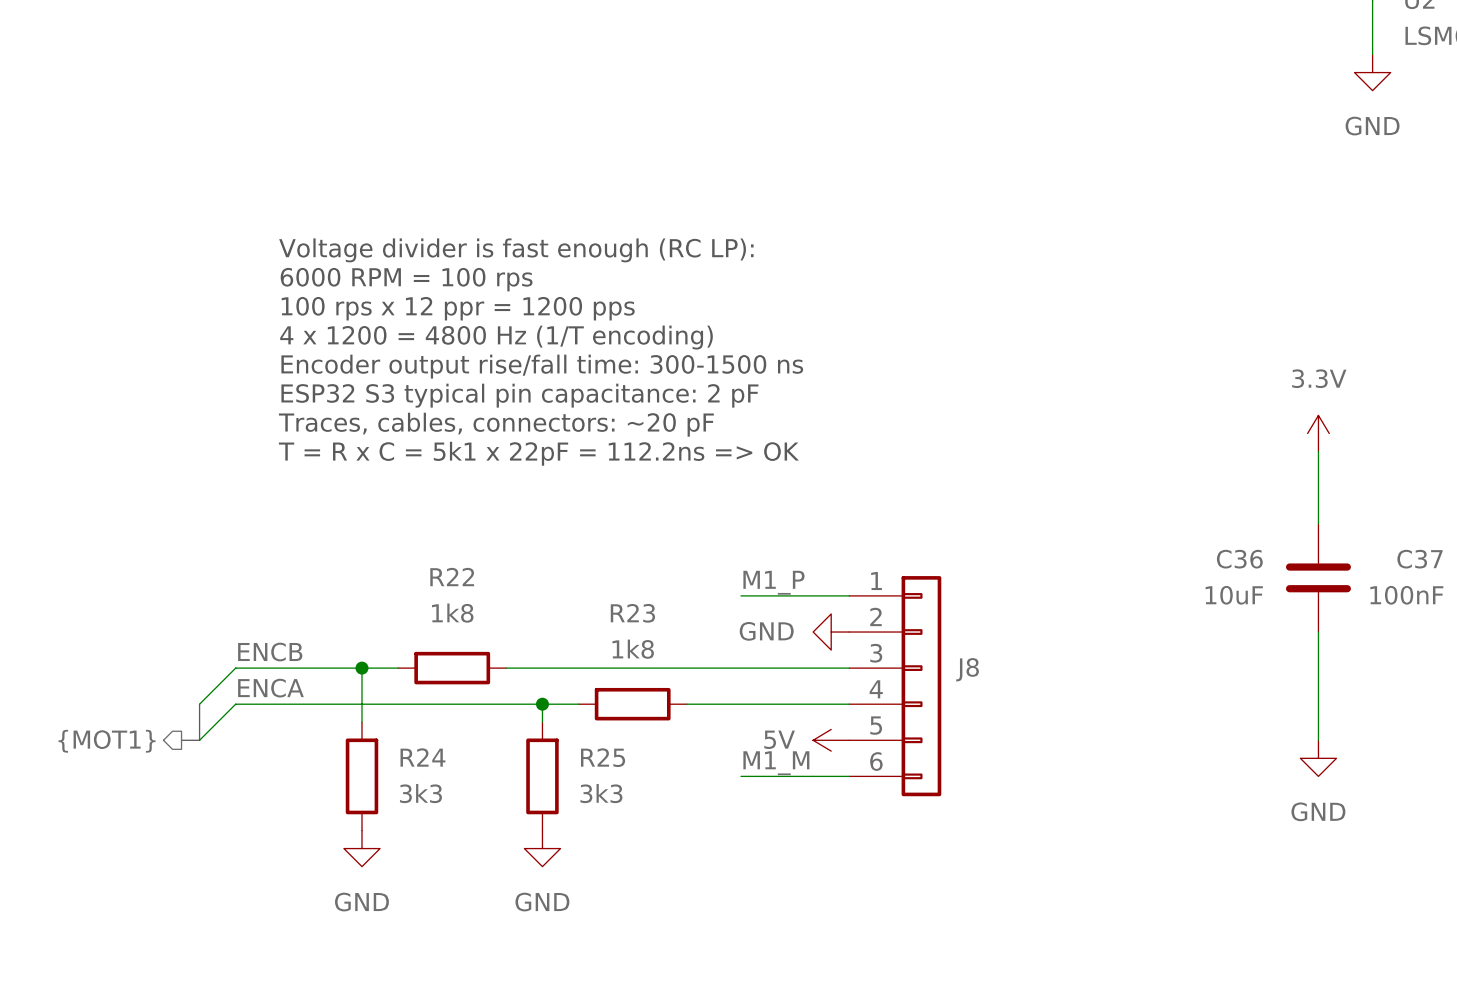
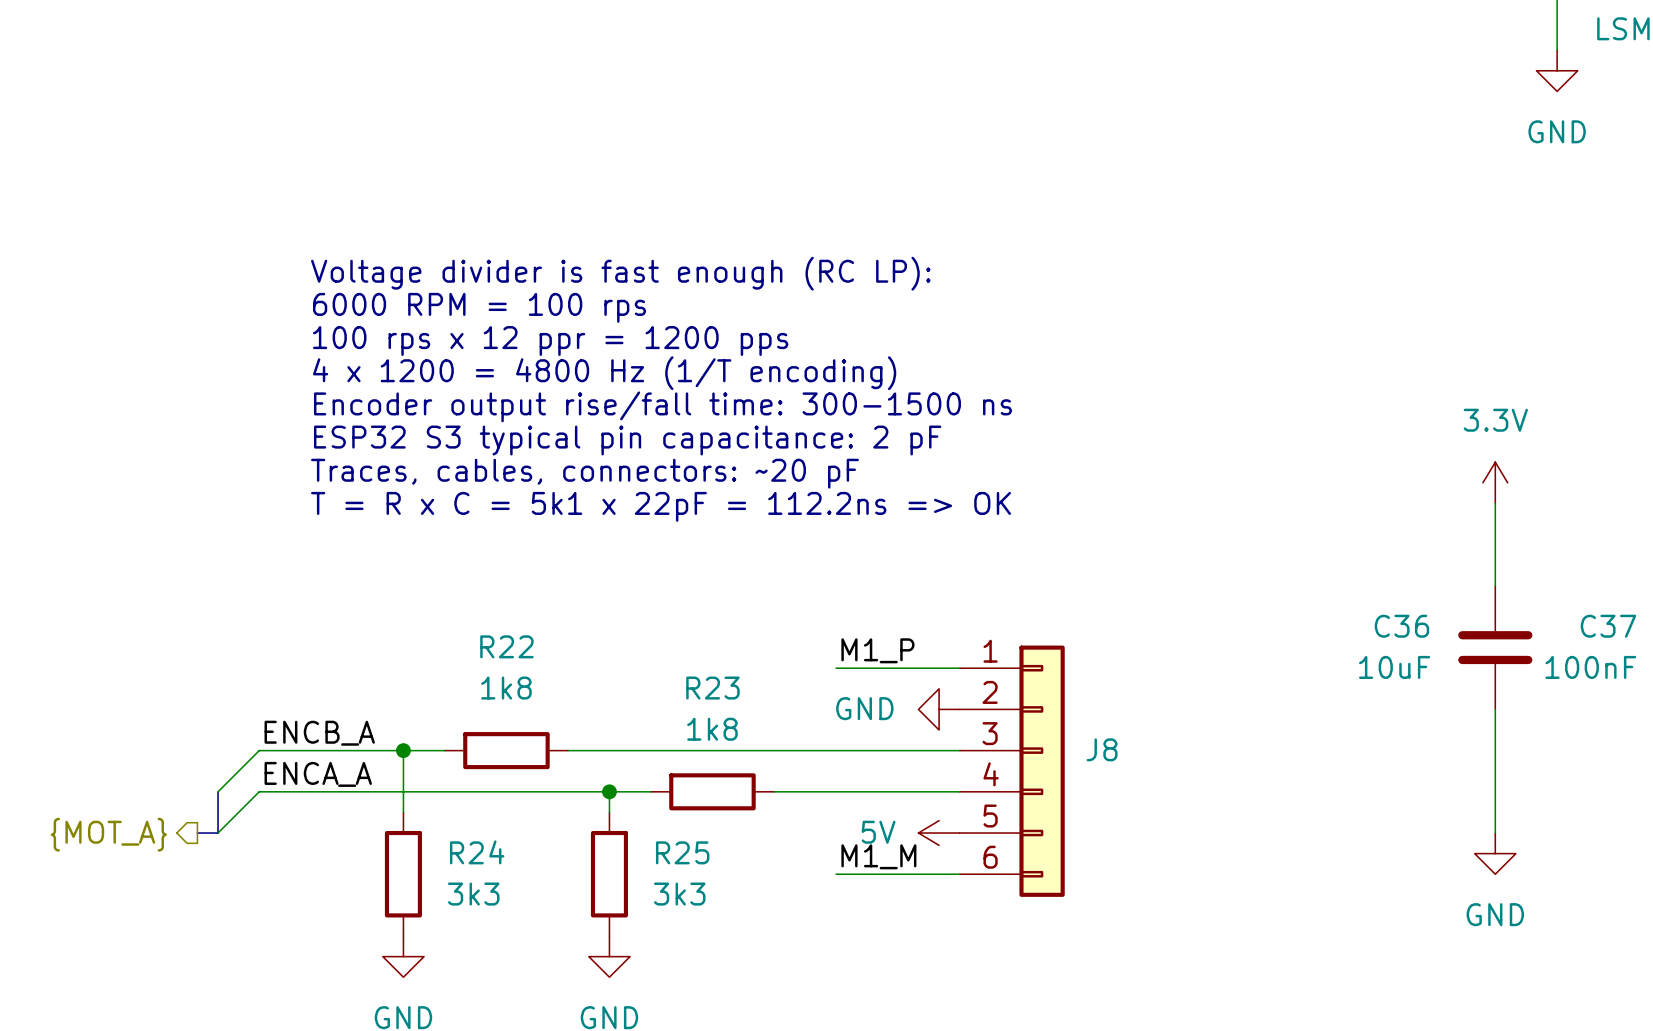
label: ENCB (270, 652) -> ENCB_A (319, 733)
label: ENCA (270, 688) -> ENCA_A (318, 774)
hierarchical label: {MOT1} (107, 741) -> {MOT_A} (108, 834)

